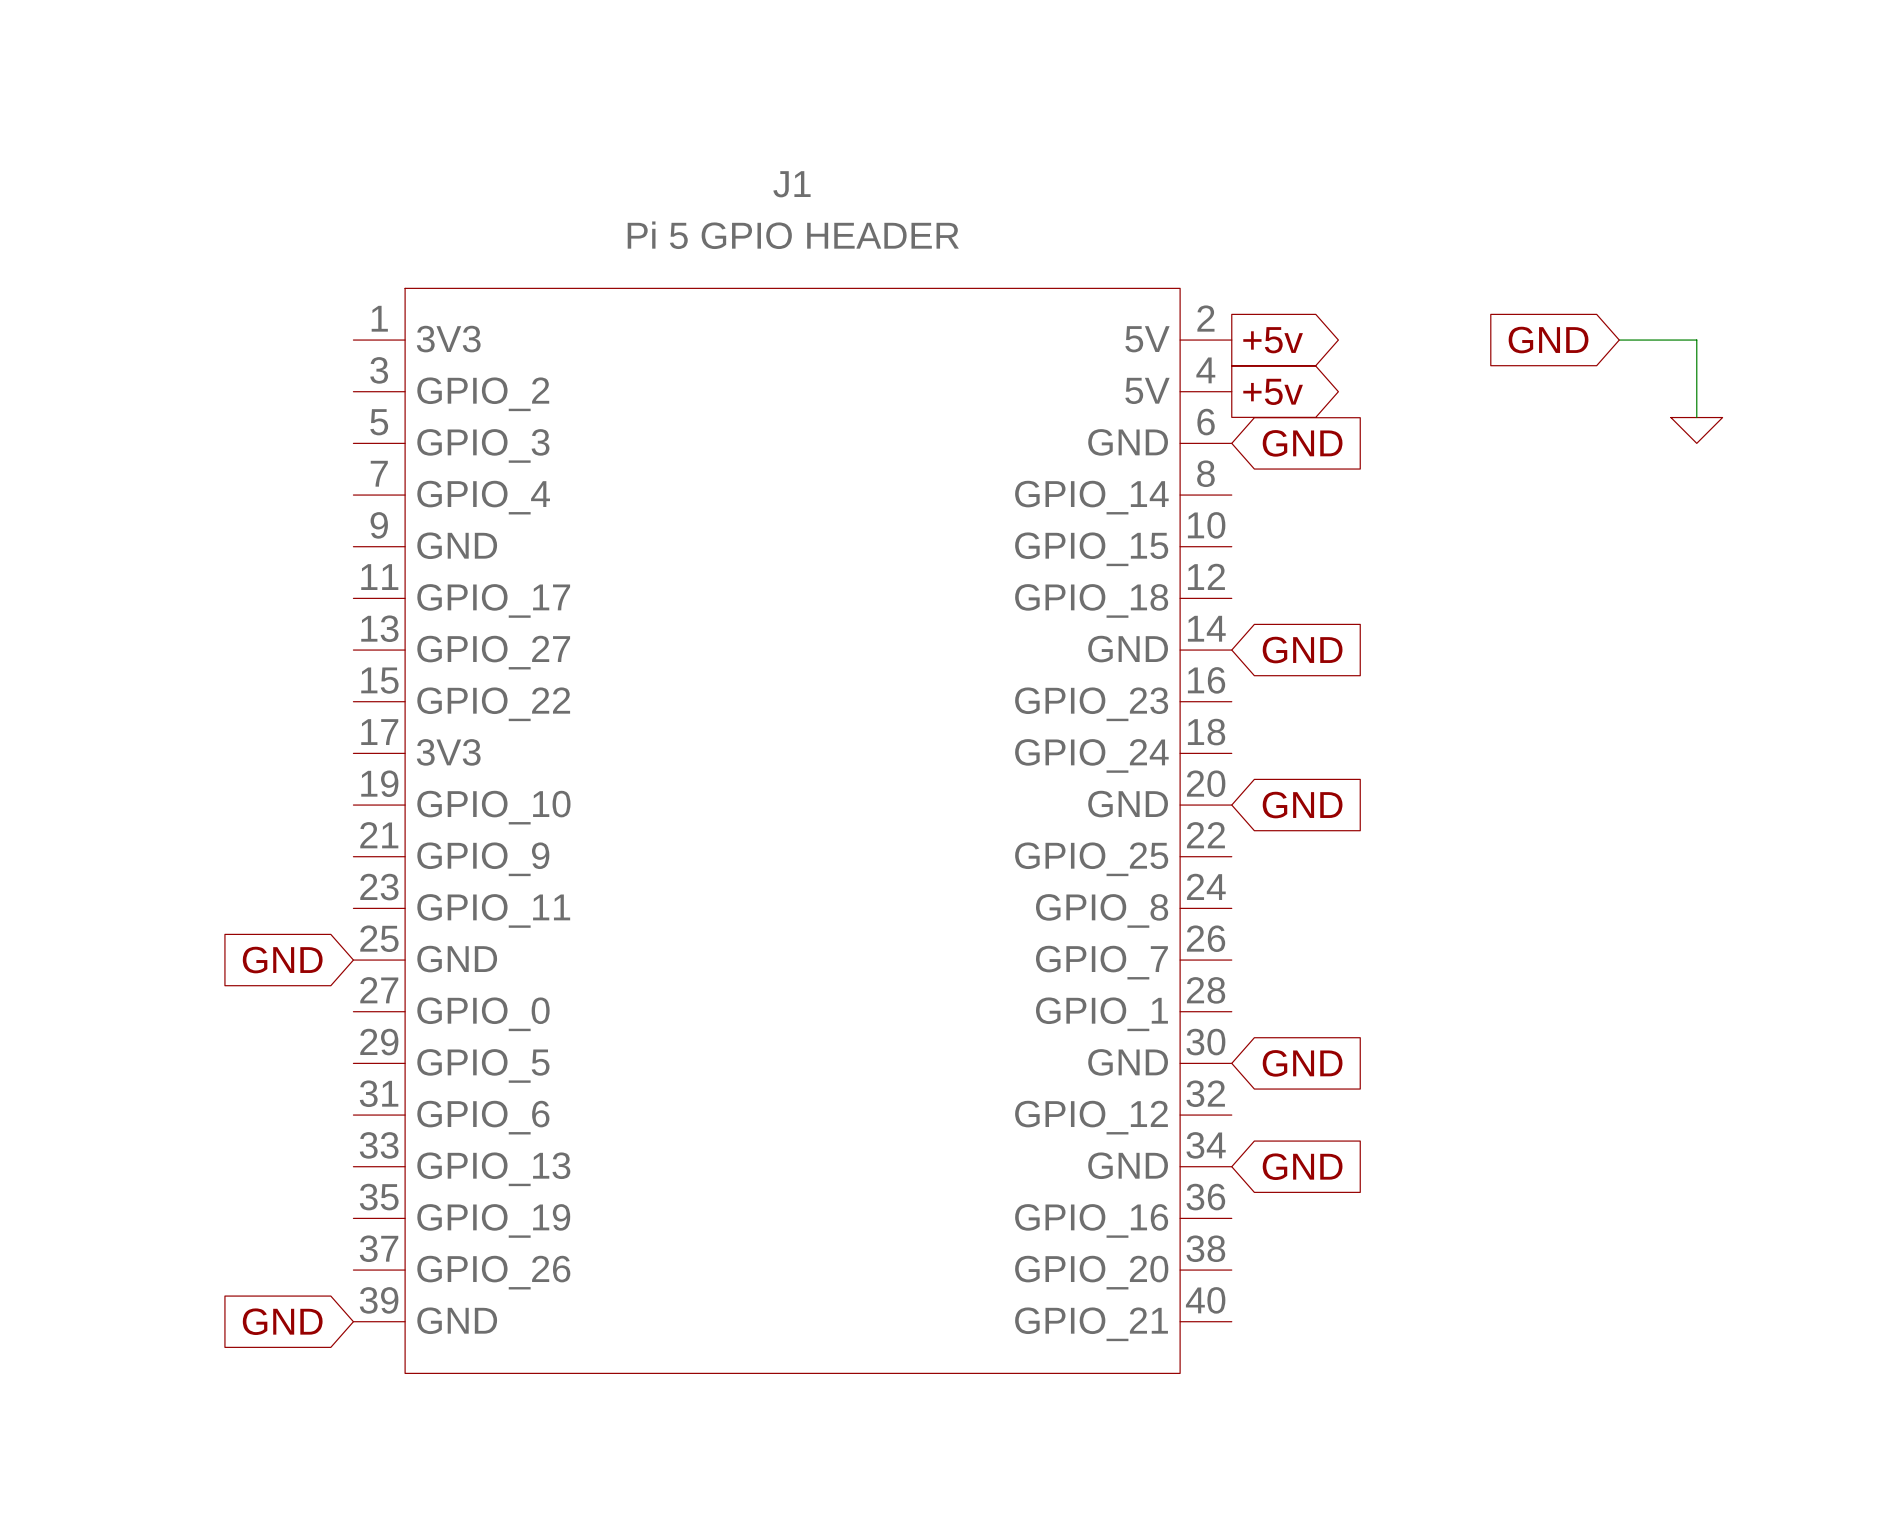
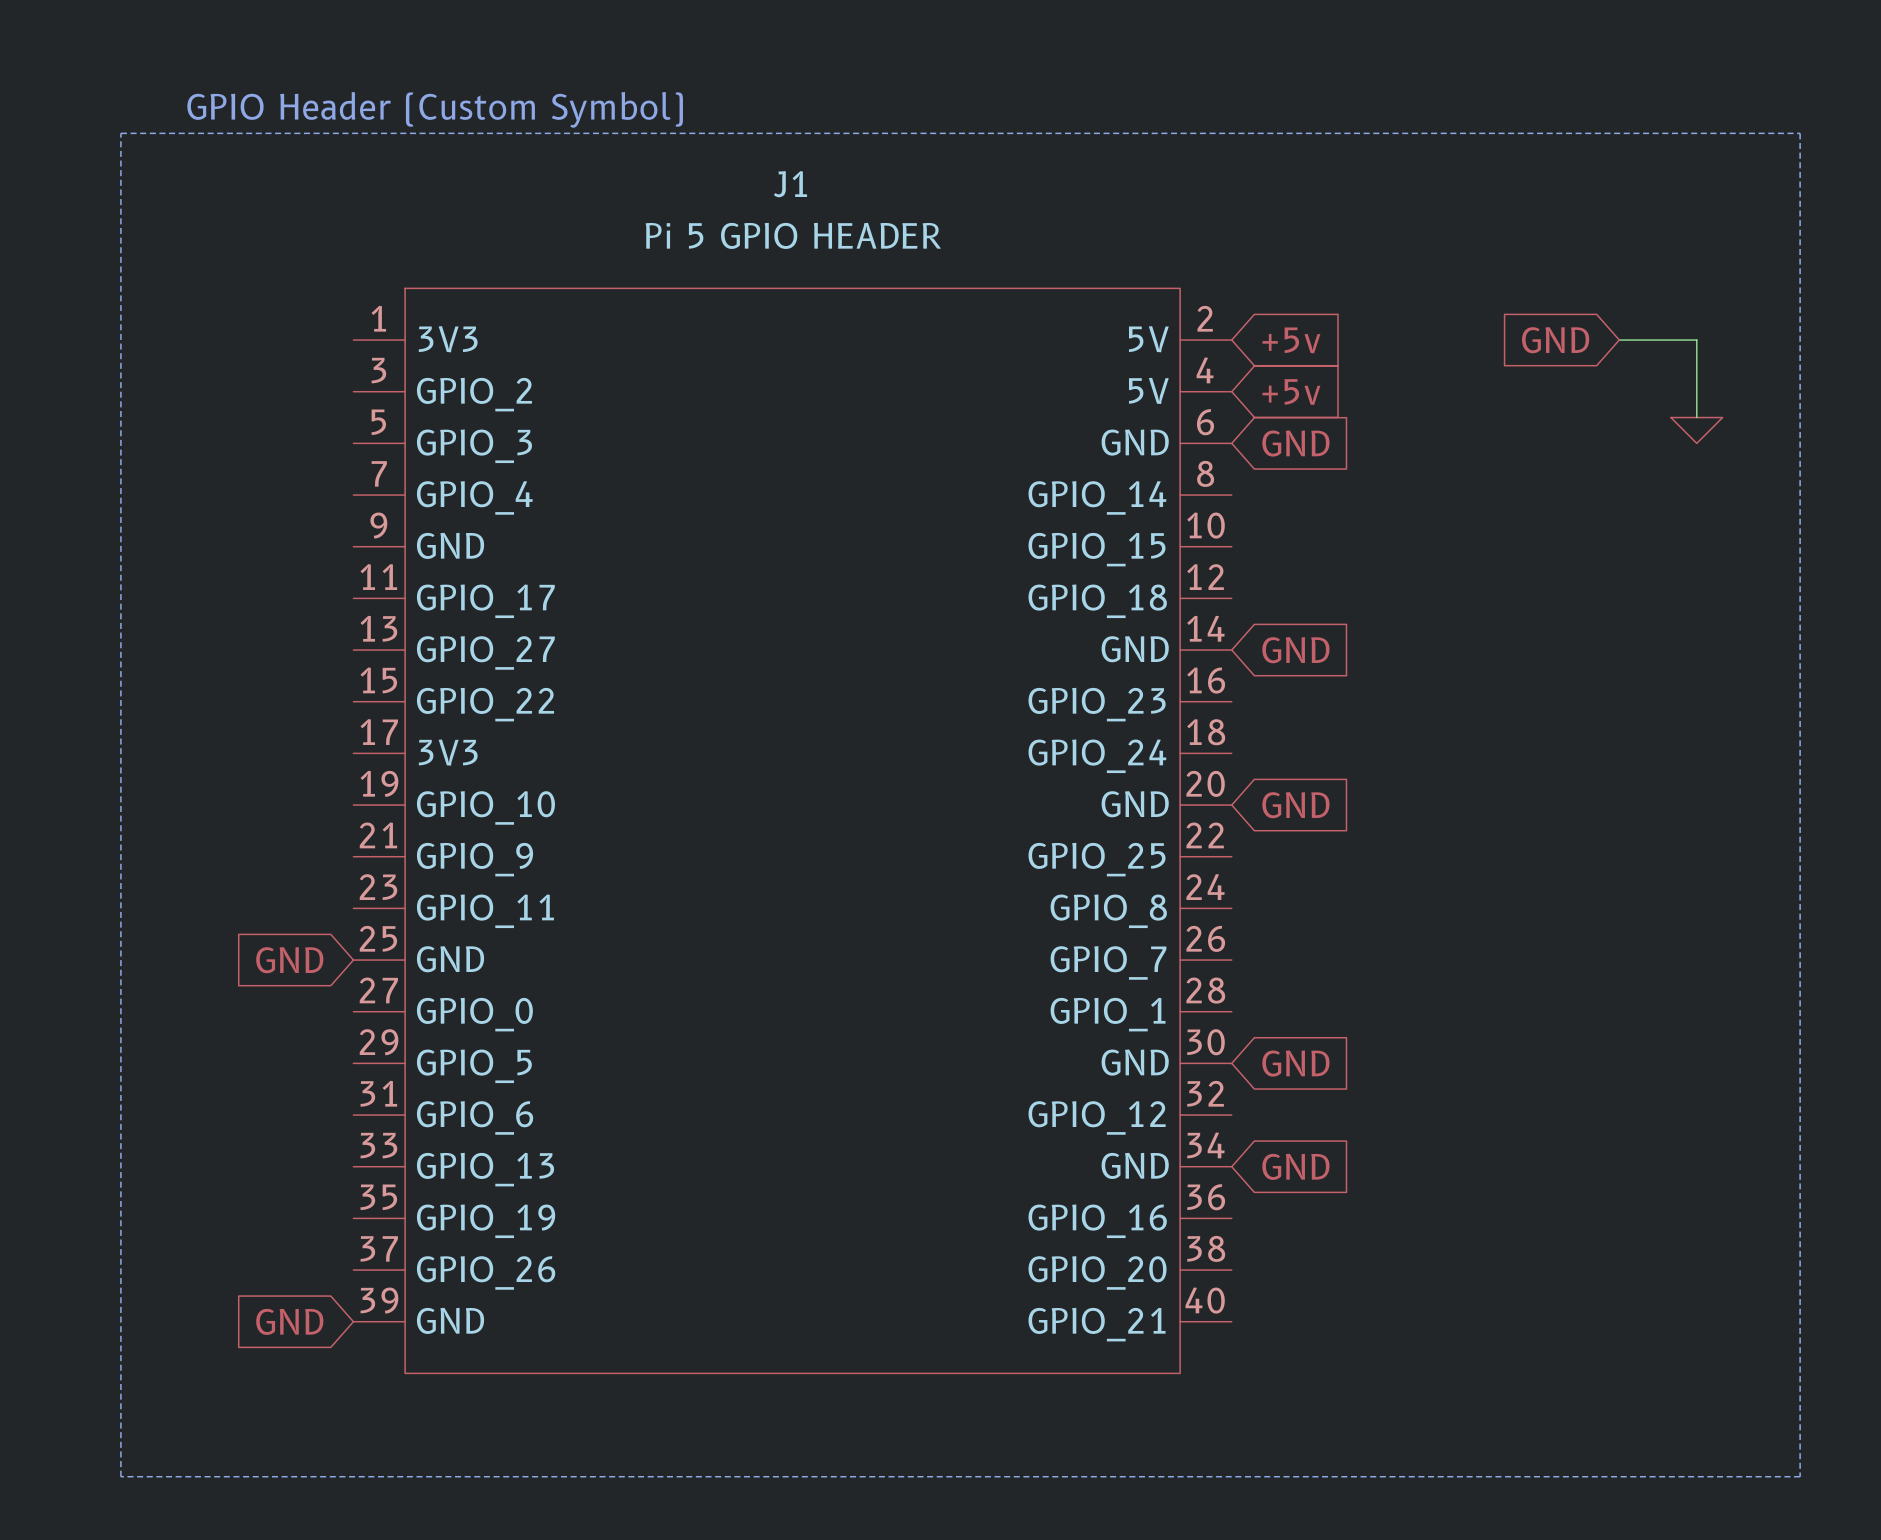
text: none -> GPIO Header (Custom Symbol) (435, 109)
line: none -> (120, 133) (1800, 133) (1800, 1476) (120, 1476) (120, 133)
global label shape: output (1273, 340) -> input (1291, 340)
global label shape: output (1273, 391) -> input (1291, 392)

